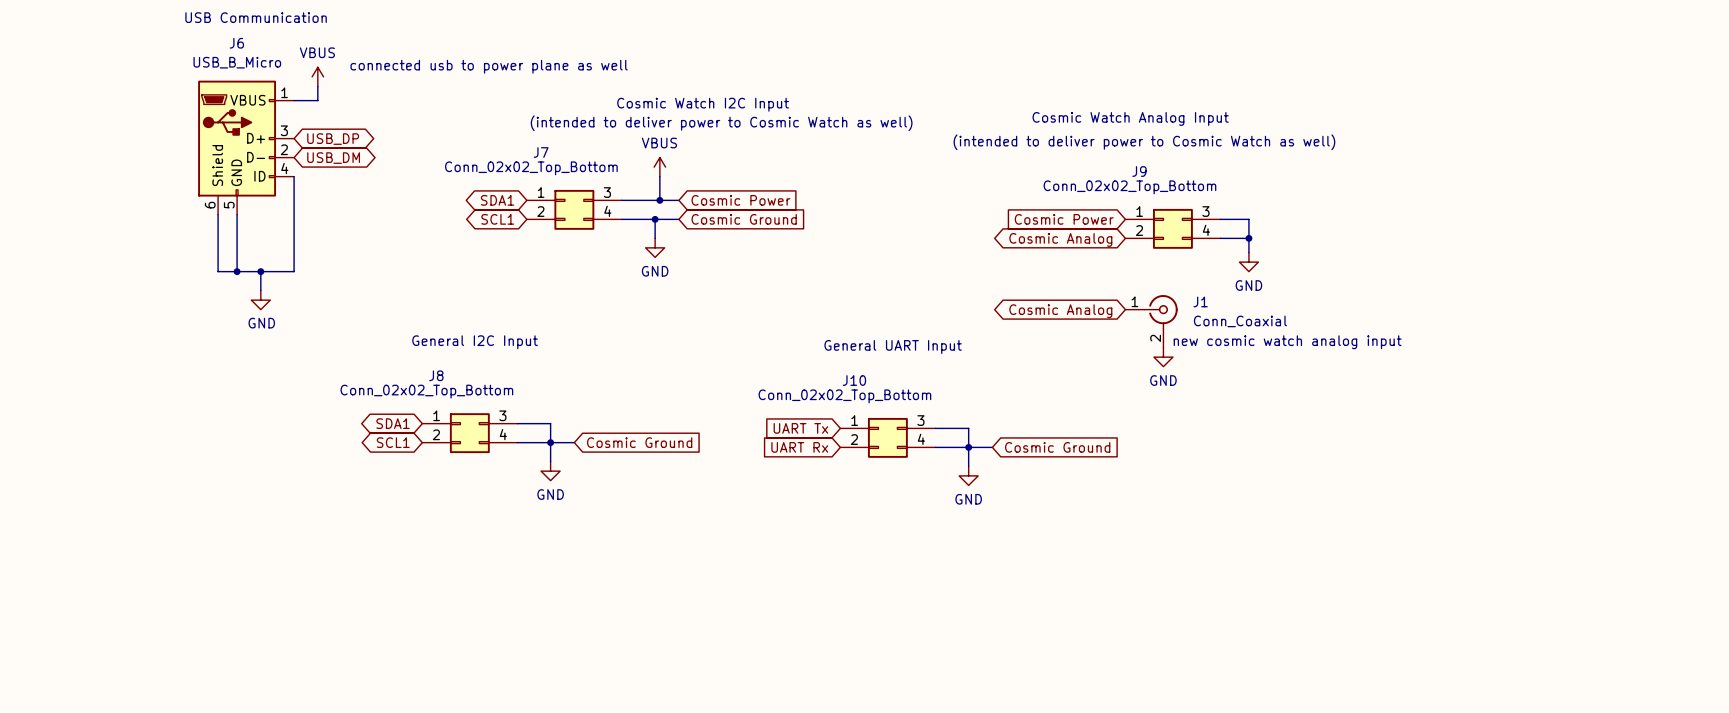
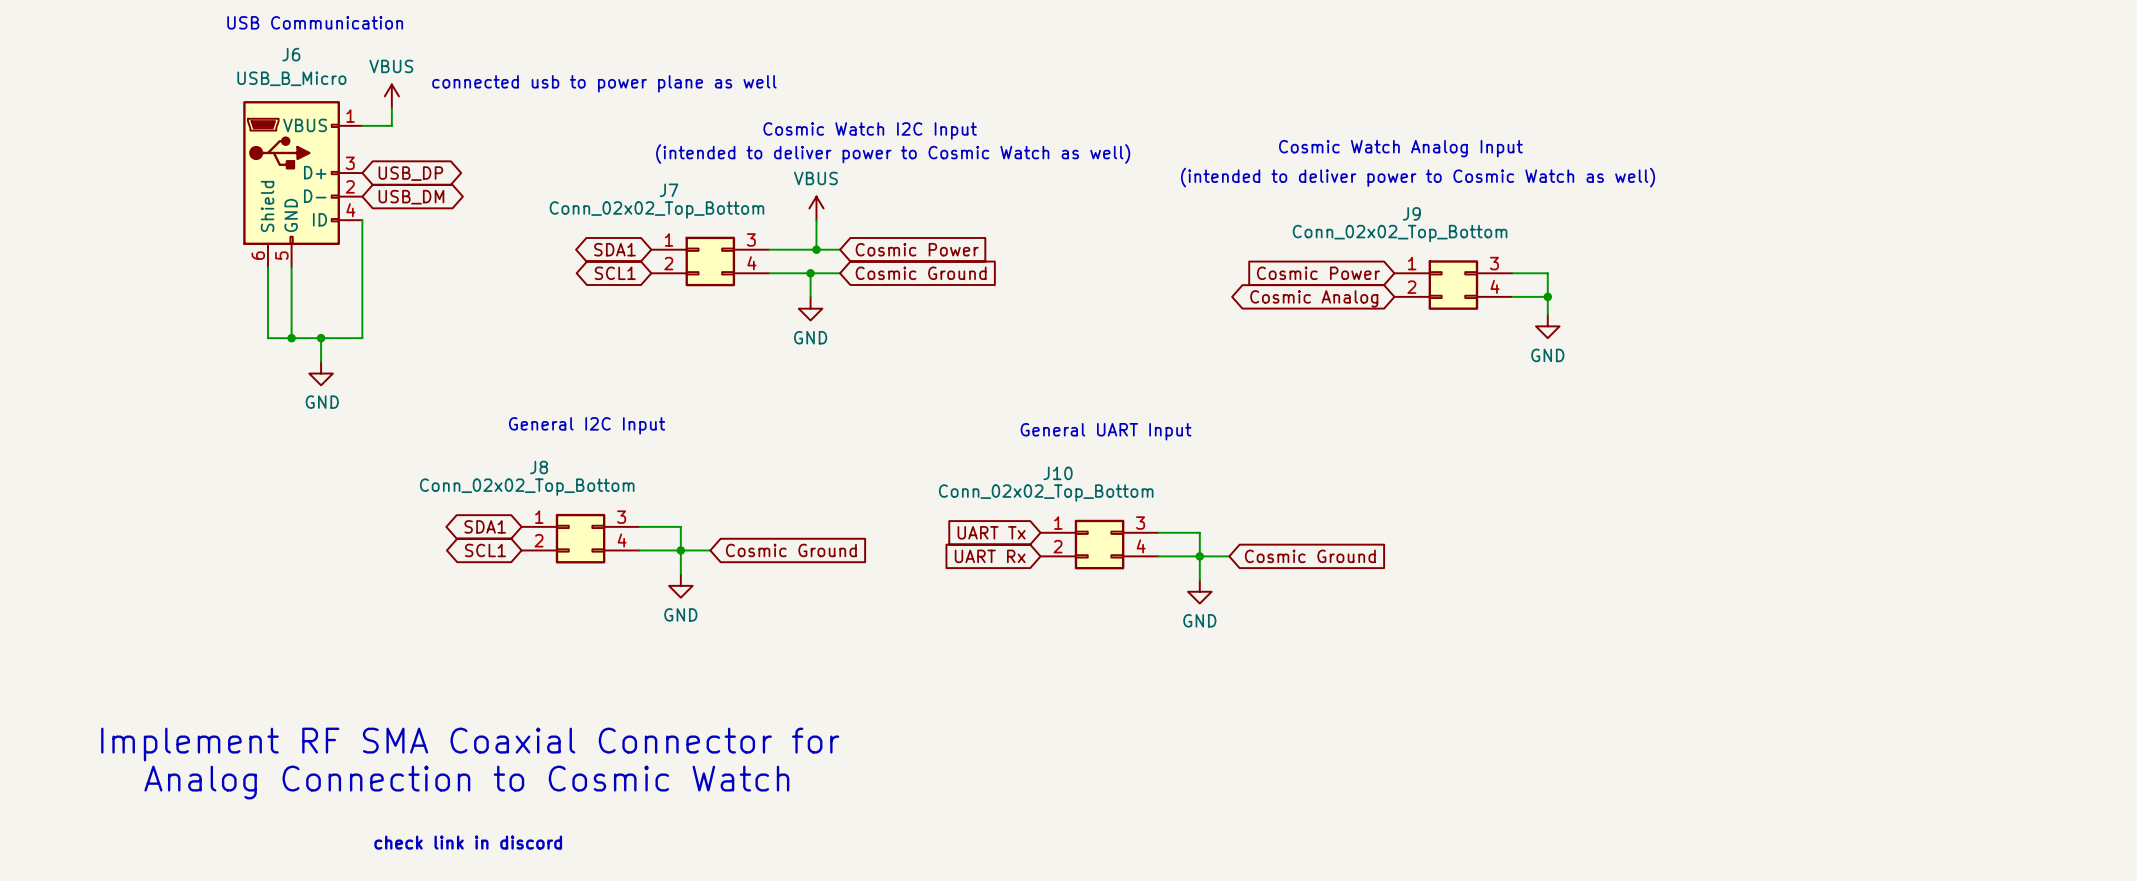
global label: Cosmic Analog (1060, 311) -> none
J1: Conn_Coaxial (1151, 321) -> none
text: new cosmic watch analog input (1287, 342) -> none
power symbol: GND (1163, 357) -> none
text: none -> Implement RF SMA Coaxial Connector for (470, 744)
text: none -> Analog Connection to Cosmic Watch (466, 782)
text: none -> check link in discord (468, 842)

